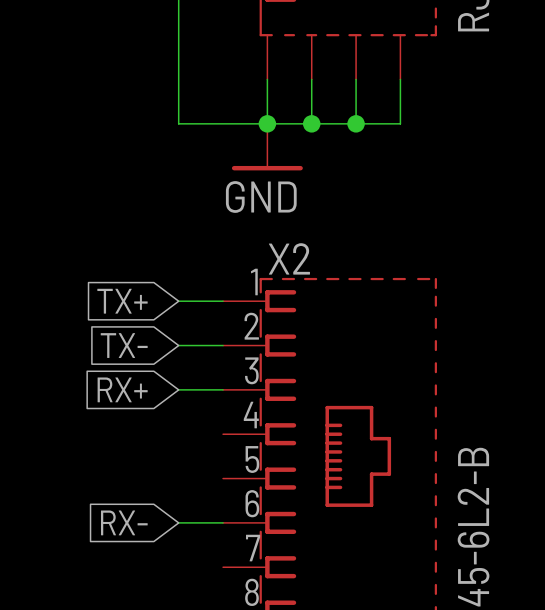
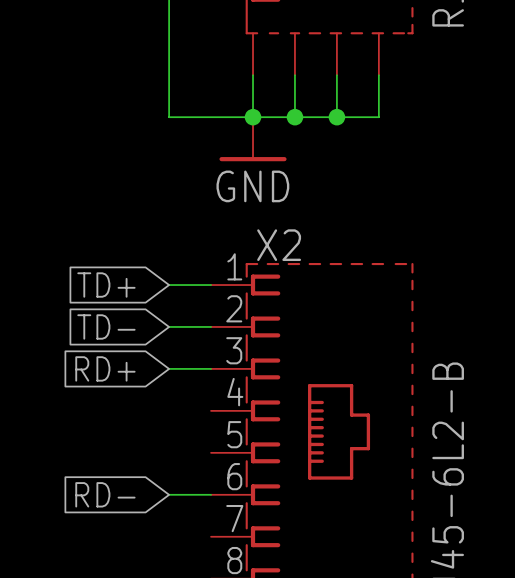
global label: TX+ (122, 301) -> TD+ (106, 285)
global label: TX- (124, 345) -> TD- (106, 326)
global label: RX+ (122, 389) -> RD+ (105, 368)
global label: RX- (124, 522) -> RD- (105, 494)

